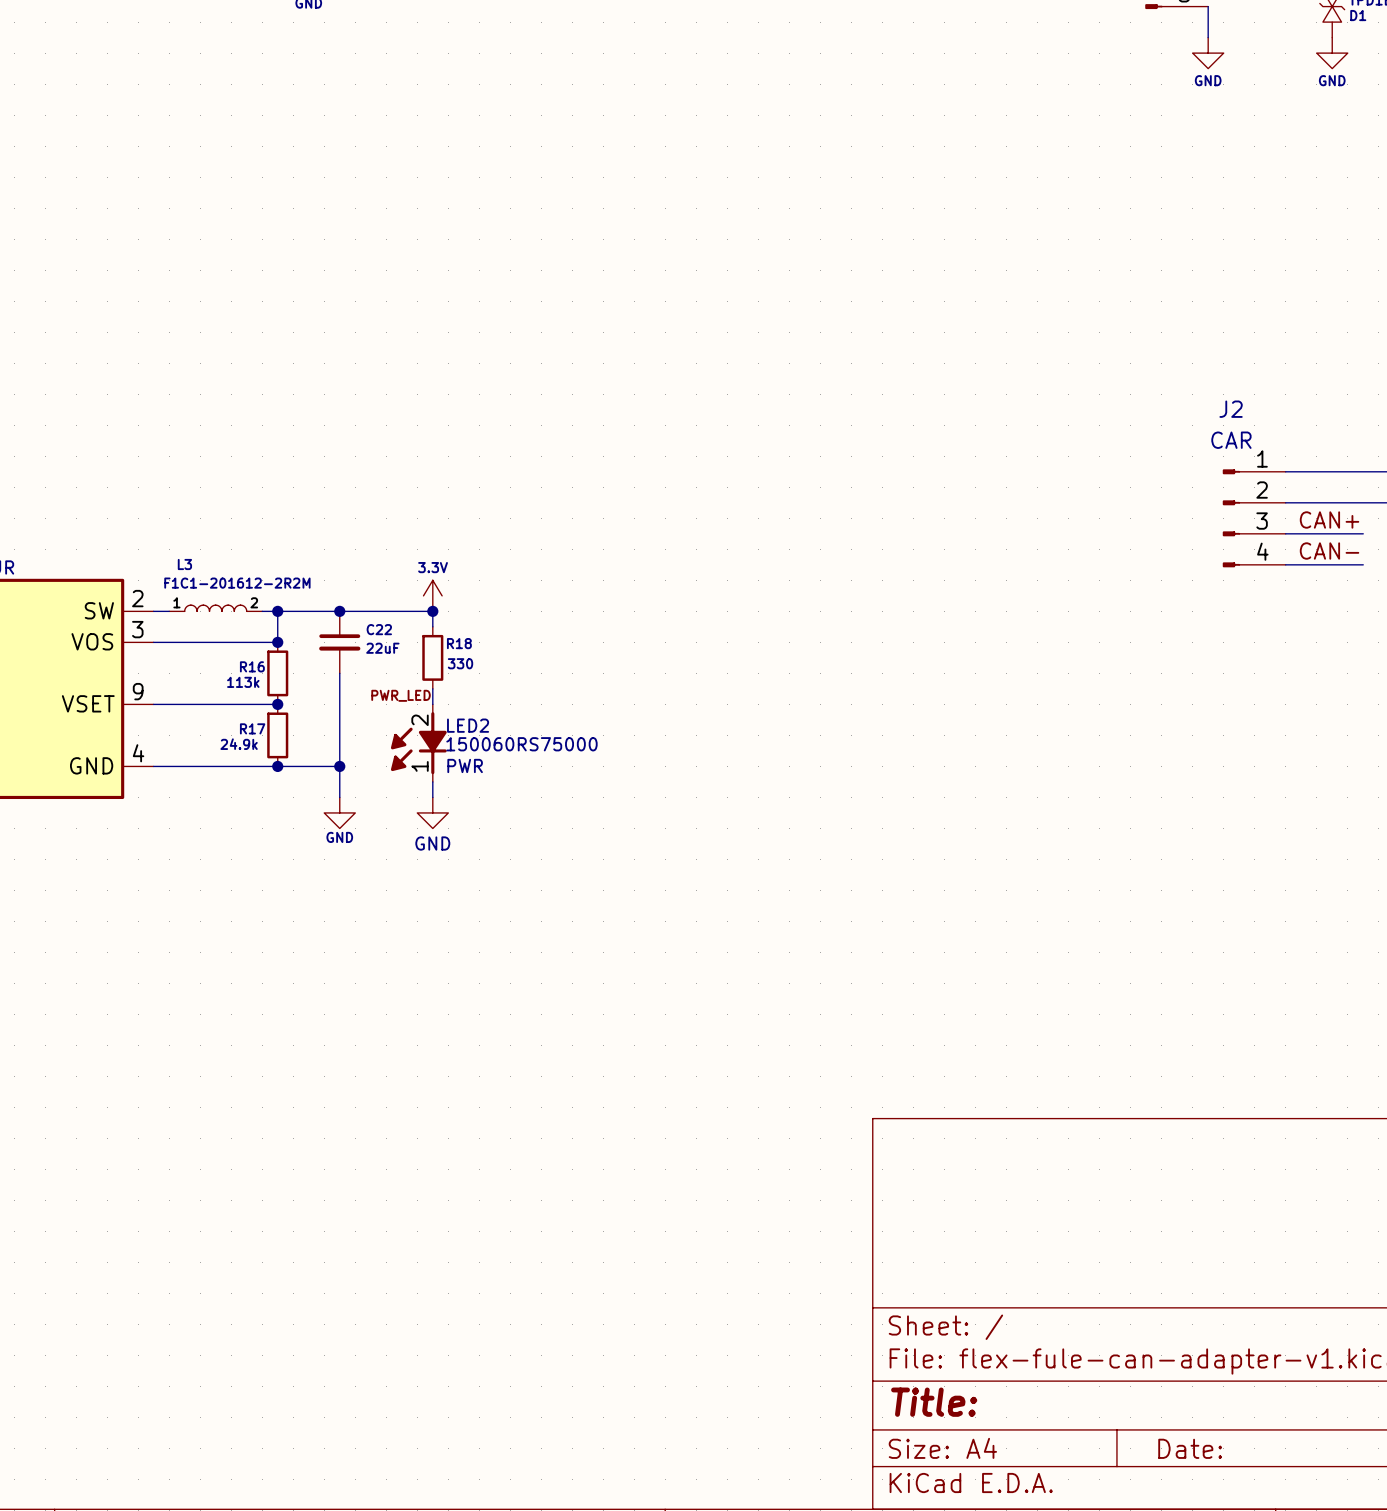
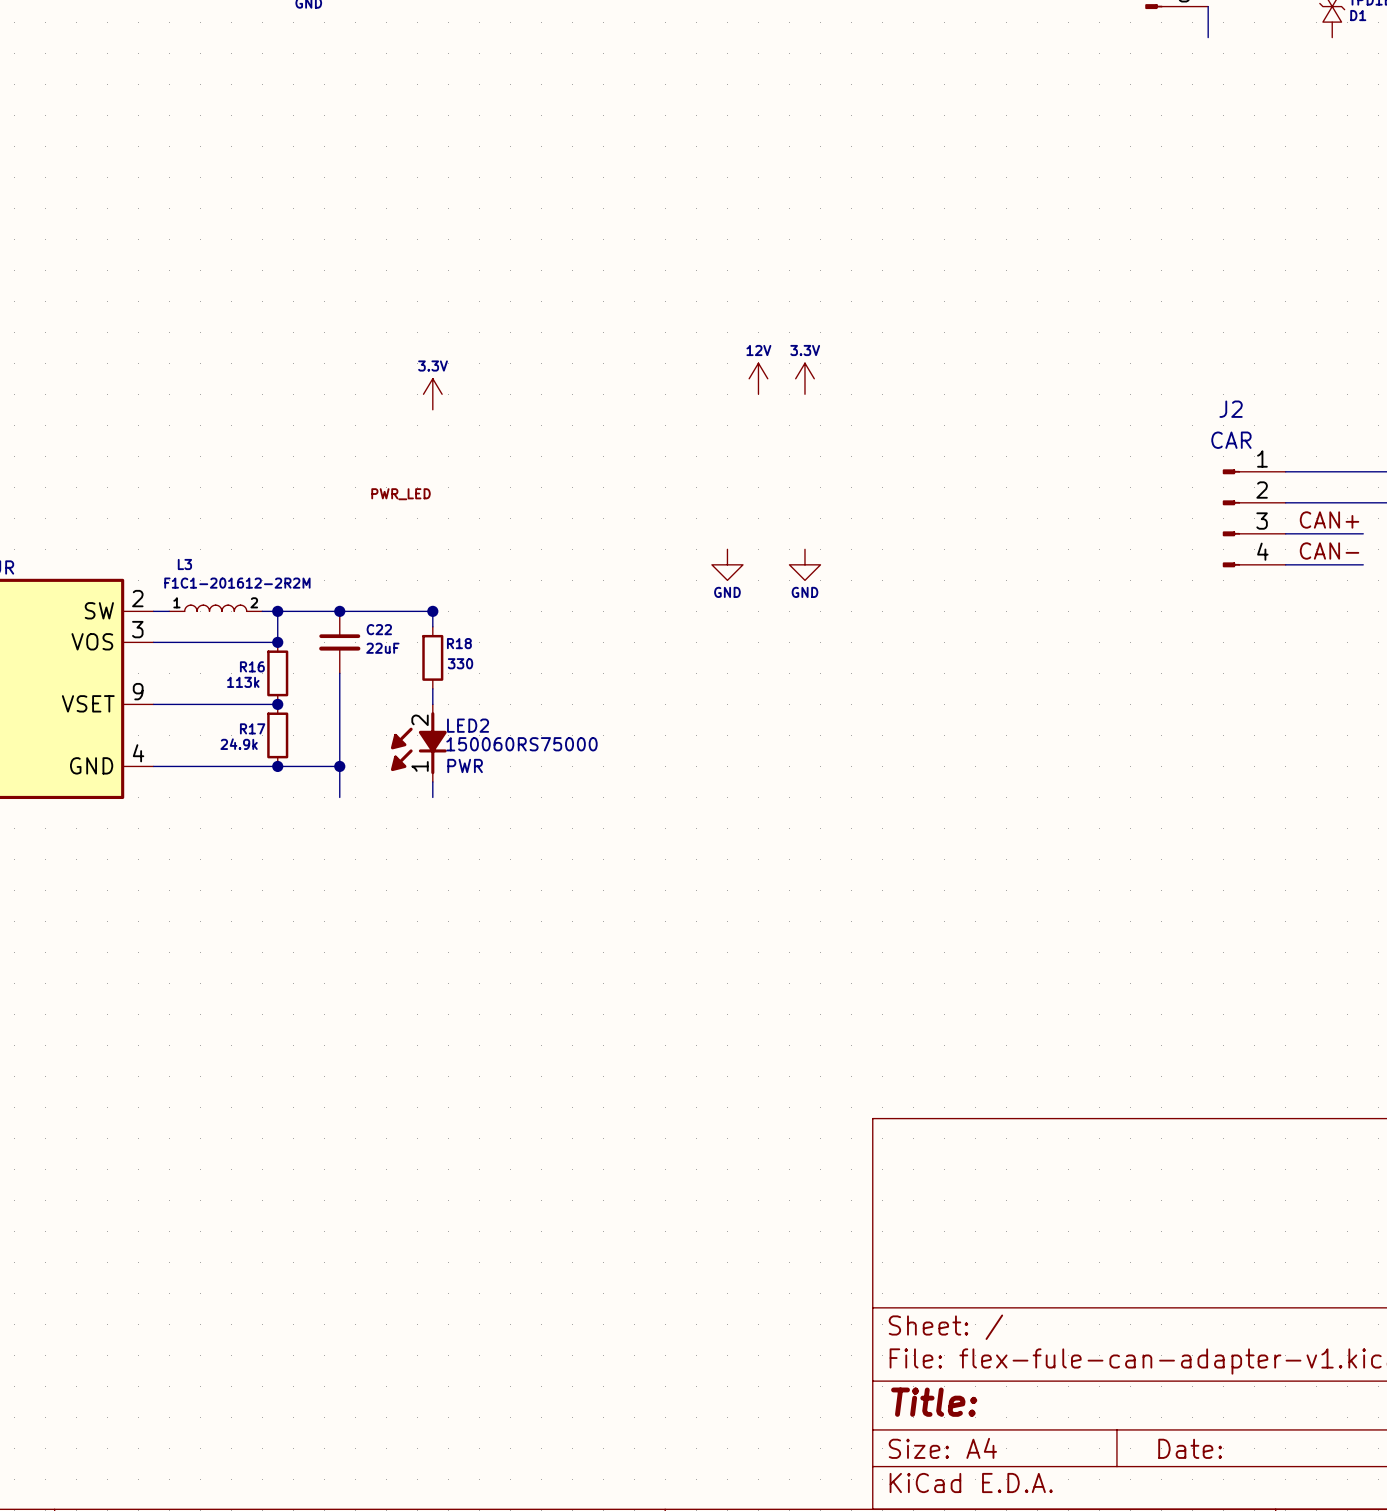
power symbol: GND (1208, 53) -> none
power symbol: GND (1332, 53) -> none
power symbol: none -> 12V (758, 378)
power symbol: none -> 3.3V (804, 378)
power symbol: none -> GND (727, 564)
power symbol: none -> GND (804, 564)
power symbol position: 3.3V (432, 595) -> 3.3V (432, 394)
label position: PWR_LED (401, 695) -> PWR_LED (401, 494)
power symbol: GND (339, 812) -> none
power symbol: GND (432, 812) -> none

